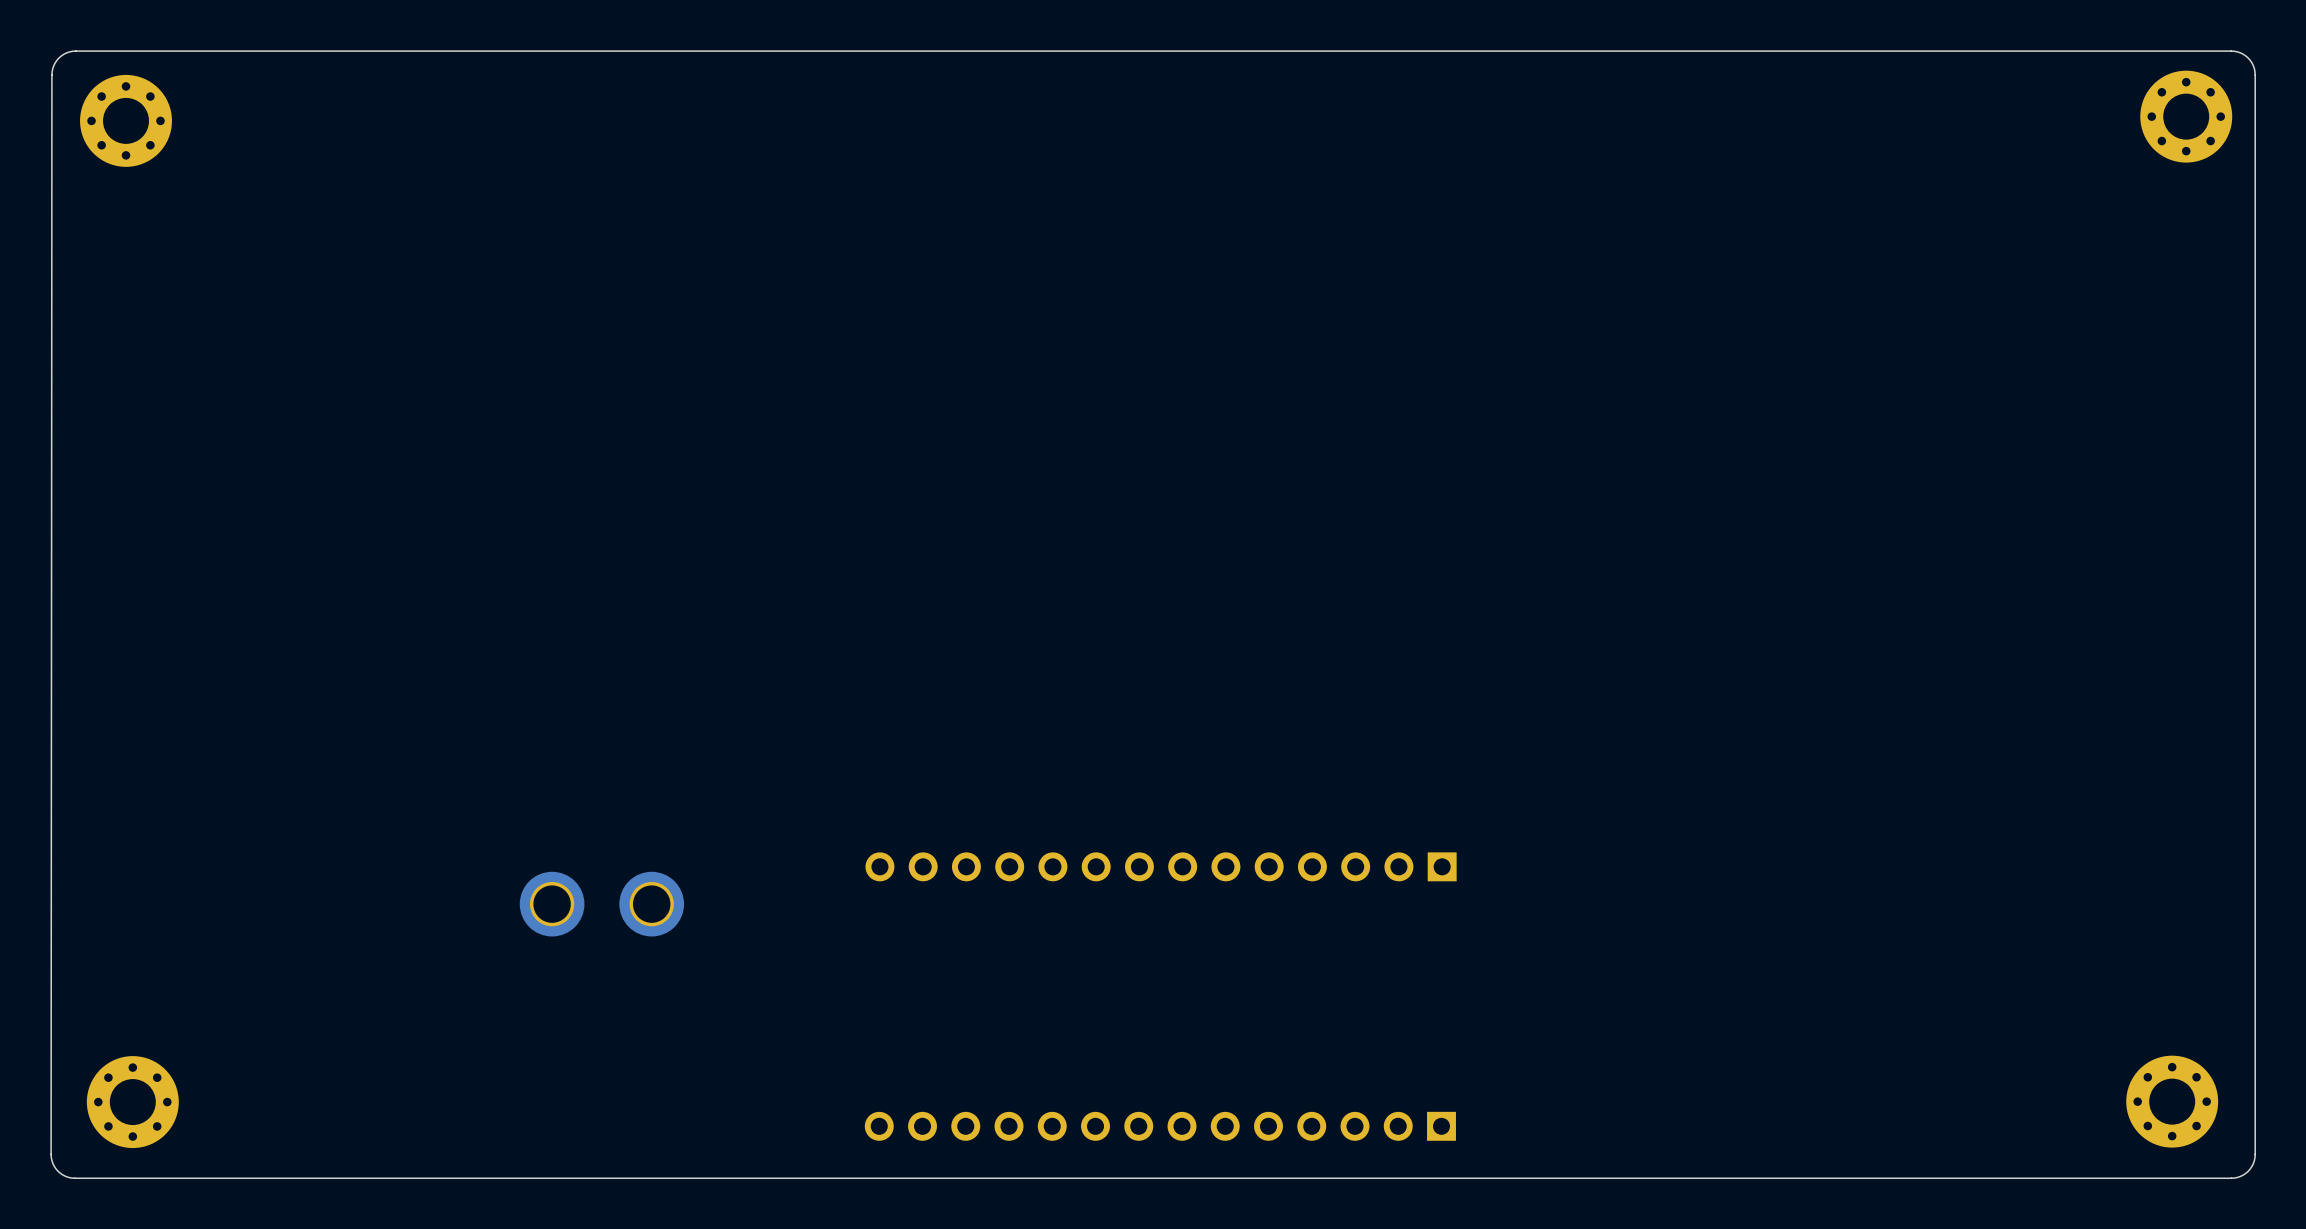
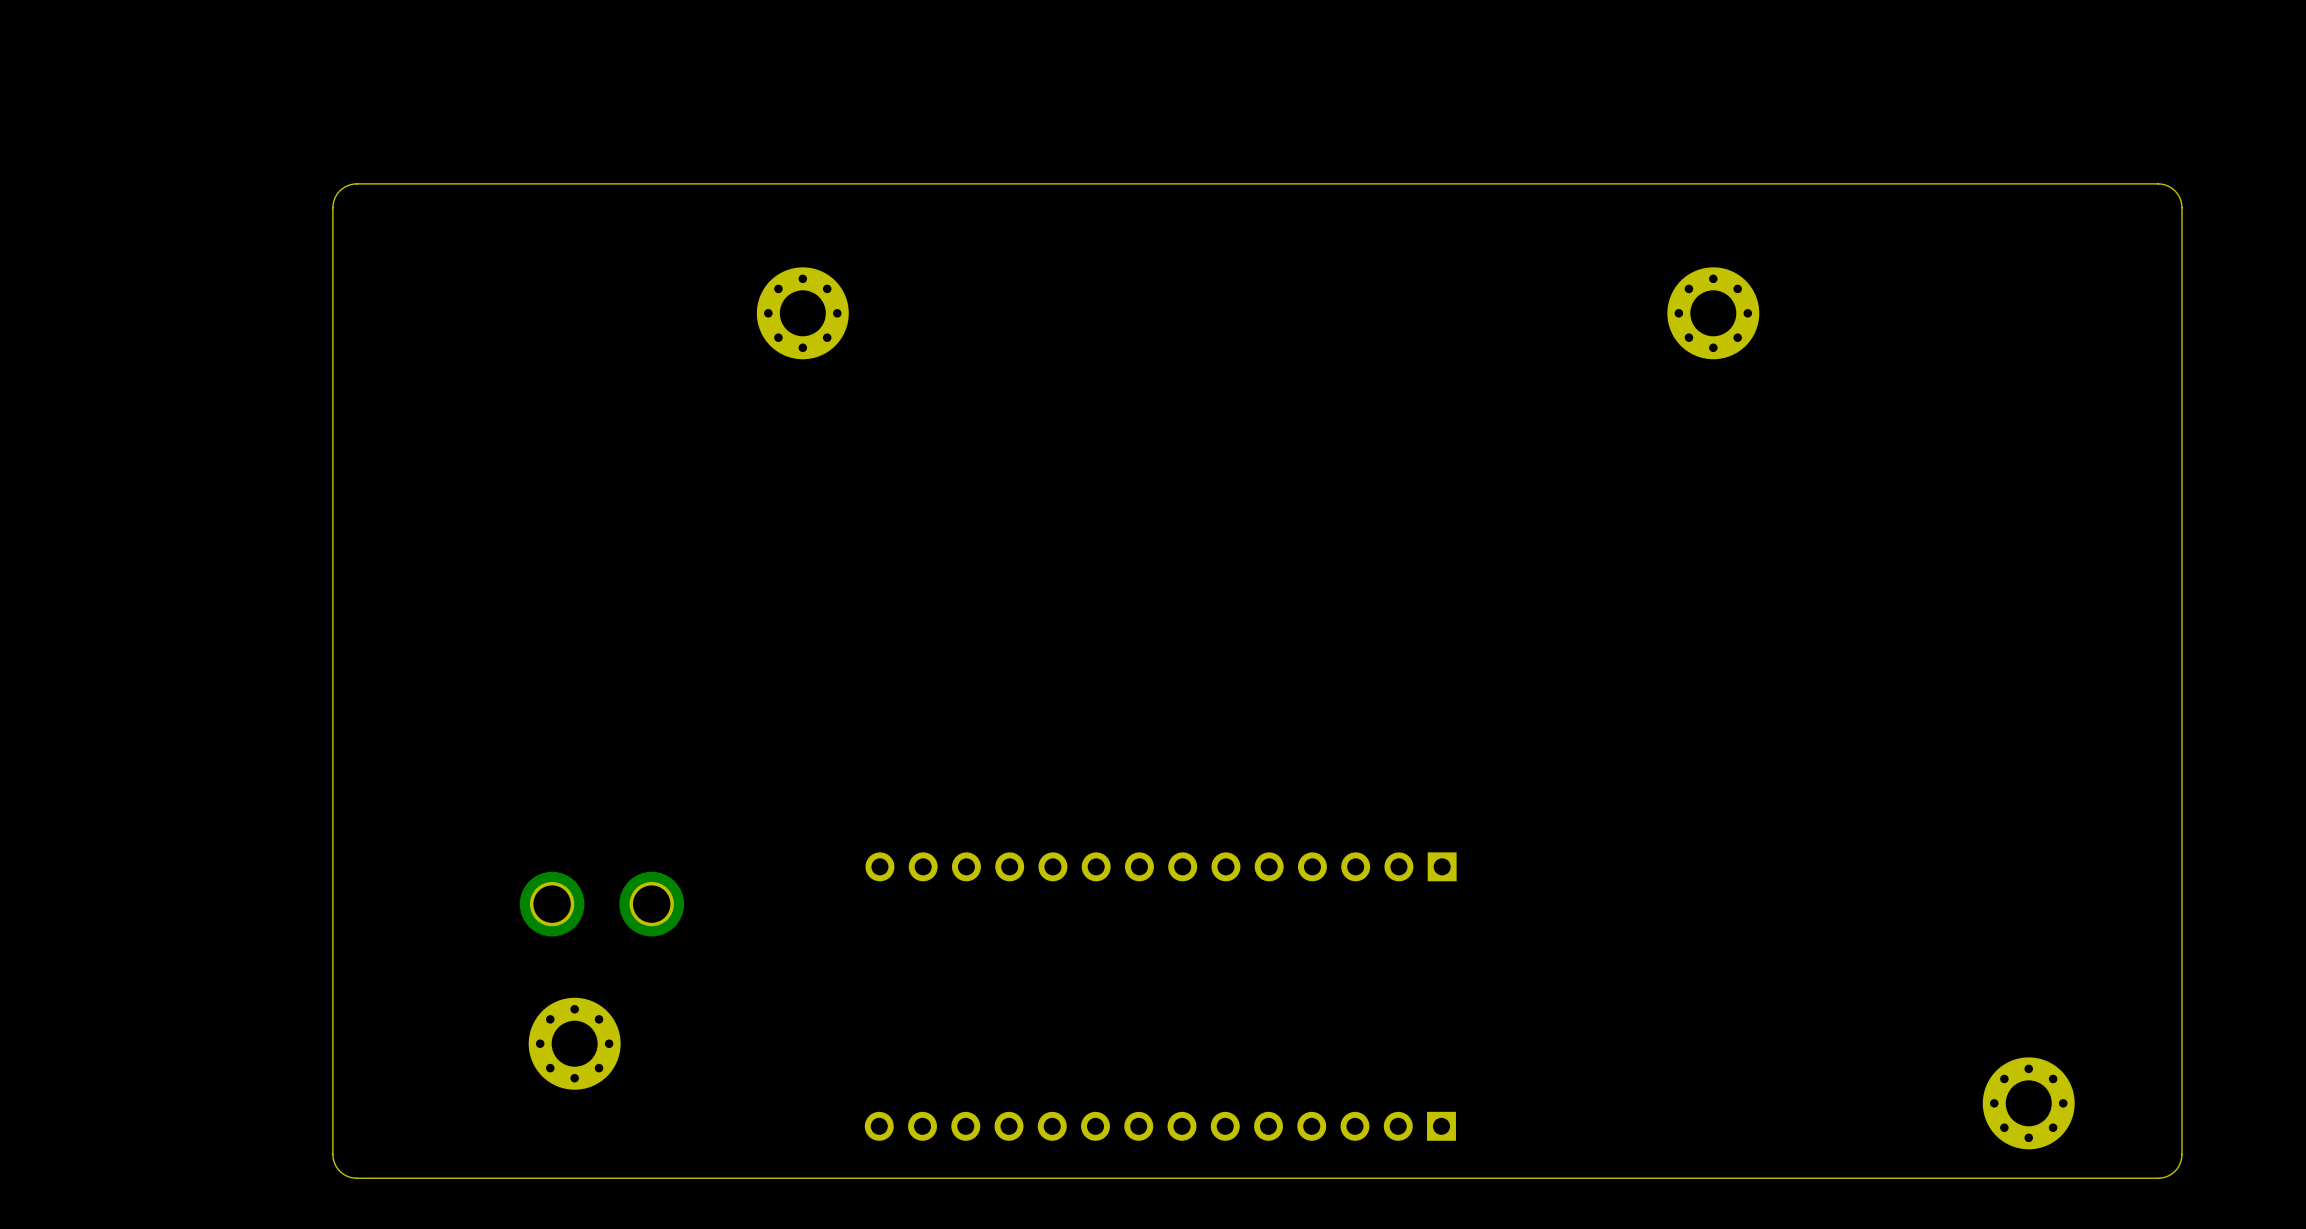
part: (2186, 116) -> none
part: (126, 120) -> none
part: none -> (802, 313)
part: none -> (1713, 313)
part: none -> (574, 1043)
part position: (2172, 1101) -> (2028, 1103)
part: (132, 1102) -> none
board edge: (2158, 1178) (2237, 1177) (2250, 1168) (2254, 1157) (2255, 74) (2252, 63) (2243, 54) (2231, 51) (69, 51) (56, 60) (51, 74) (51, 1160) (60, 1173) (74, 1178) (356, 1178) -> (2158, 1178) (2167, 1176) (2175, 1171) (2180, 1163) (2181, 1154) (2181, 207) (2180, 198) (2175, 190) (2167, 185) (2158, 183) (356, 183) (344, 187) (336, 195) (332, 207) (332, 1154) (334, 1163) (339, 1171) (347, 1176) (356, 1178)

